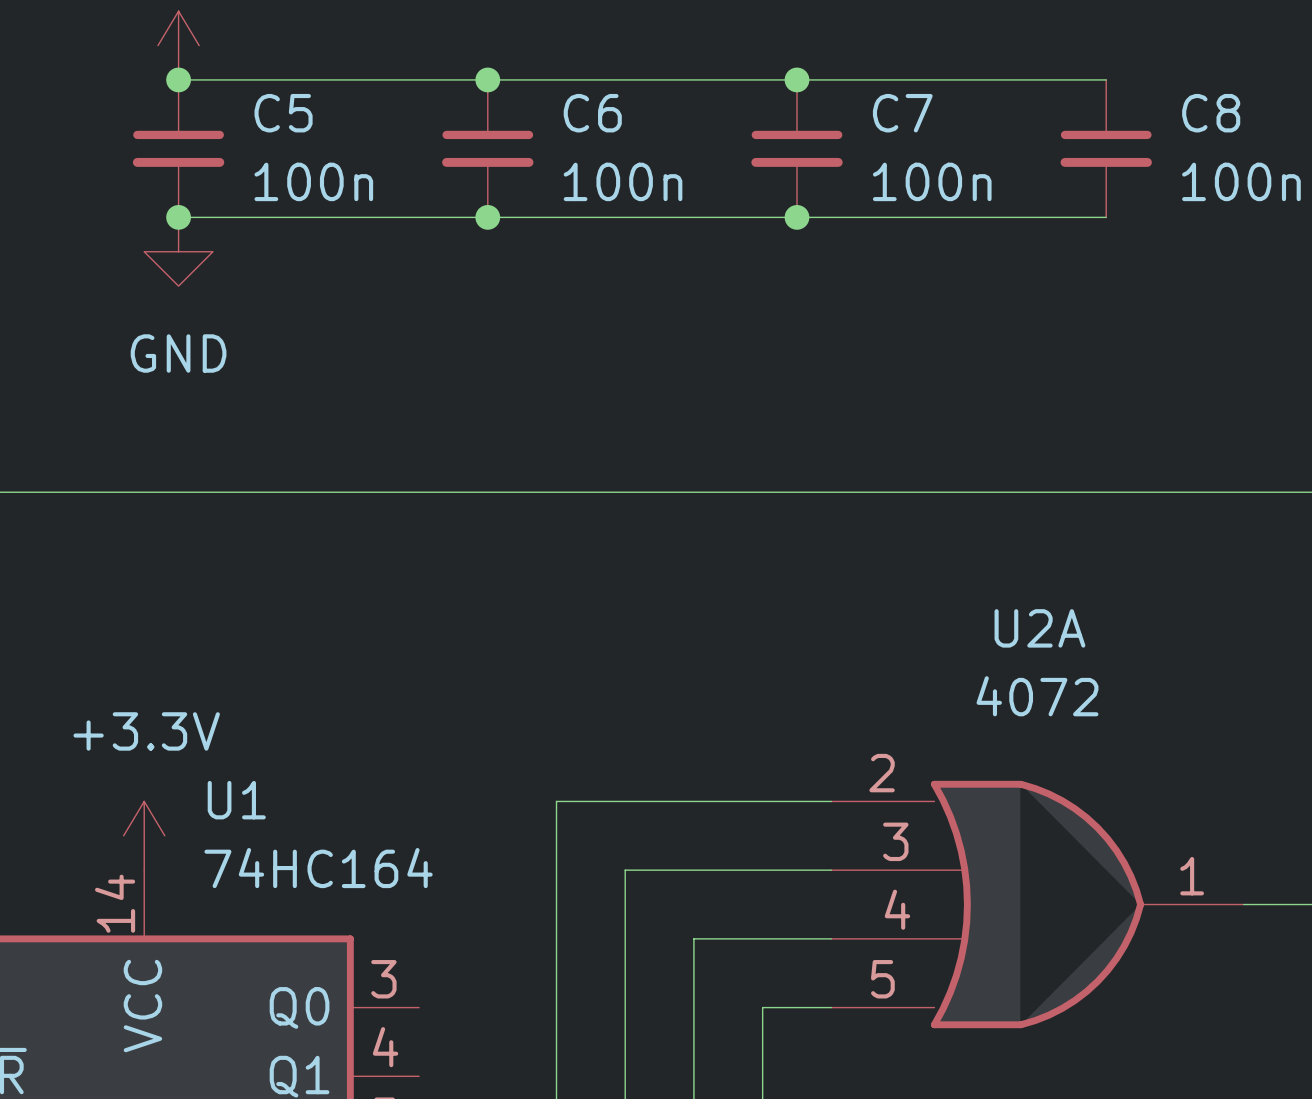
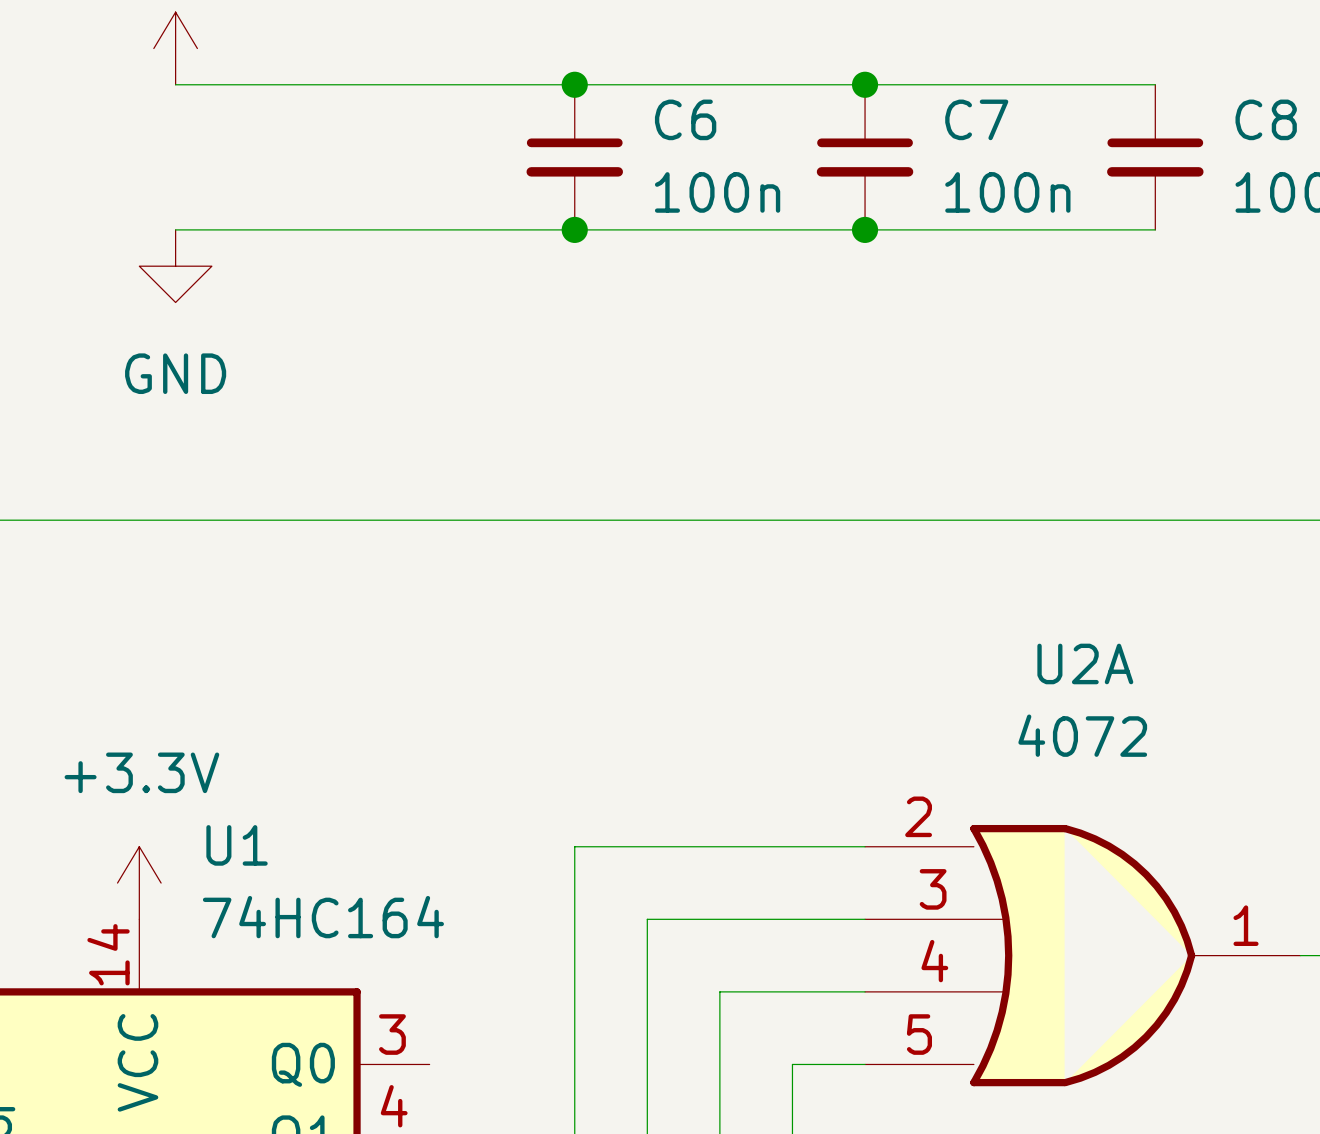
junction: (178, 79) -> none
junction position: (487, 79) -> (574, 84)
junction position: (797, 79) -> (865, 84)
C5: 100n (178, 148) -> none
C6 position: (487, 148) -> (574, 157)
C7 position: (797, 148) -> (865, 157)
junction: (178, 217) -> none
junction position: (487, 217) -> (574, 229)
junction position: (797, 217) -> (865, 229)

